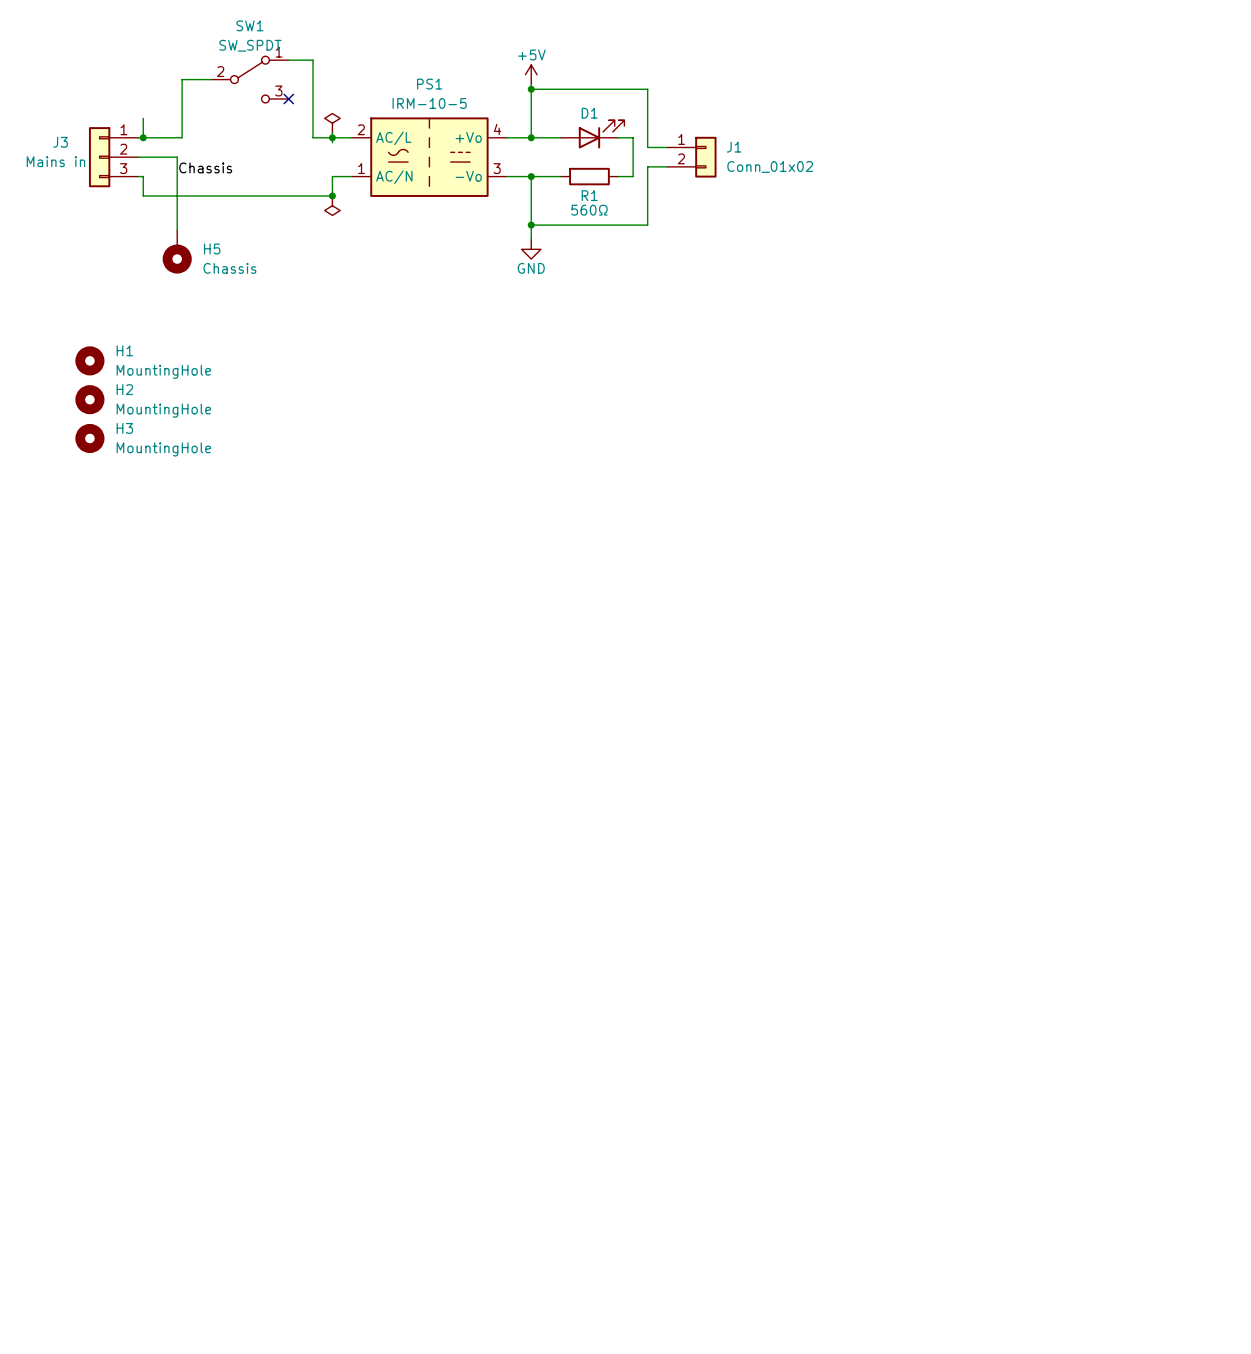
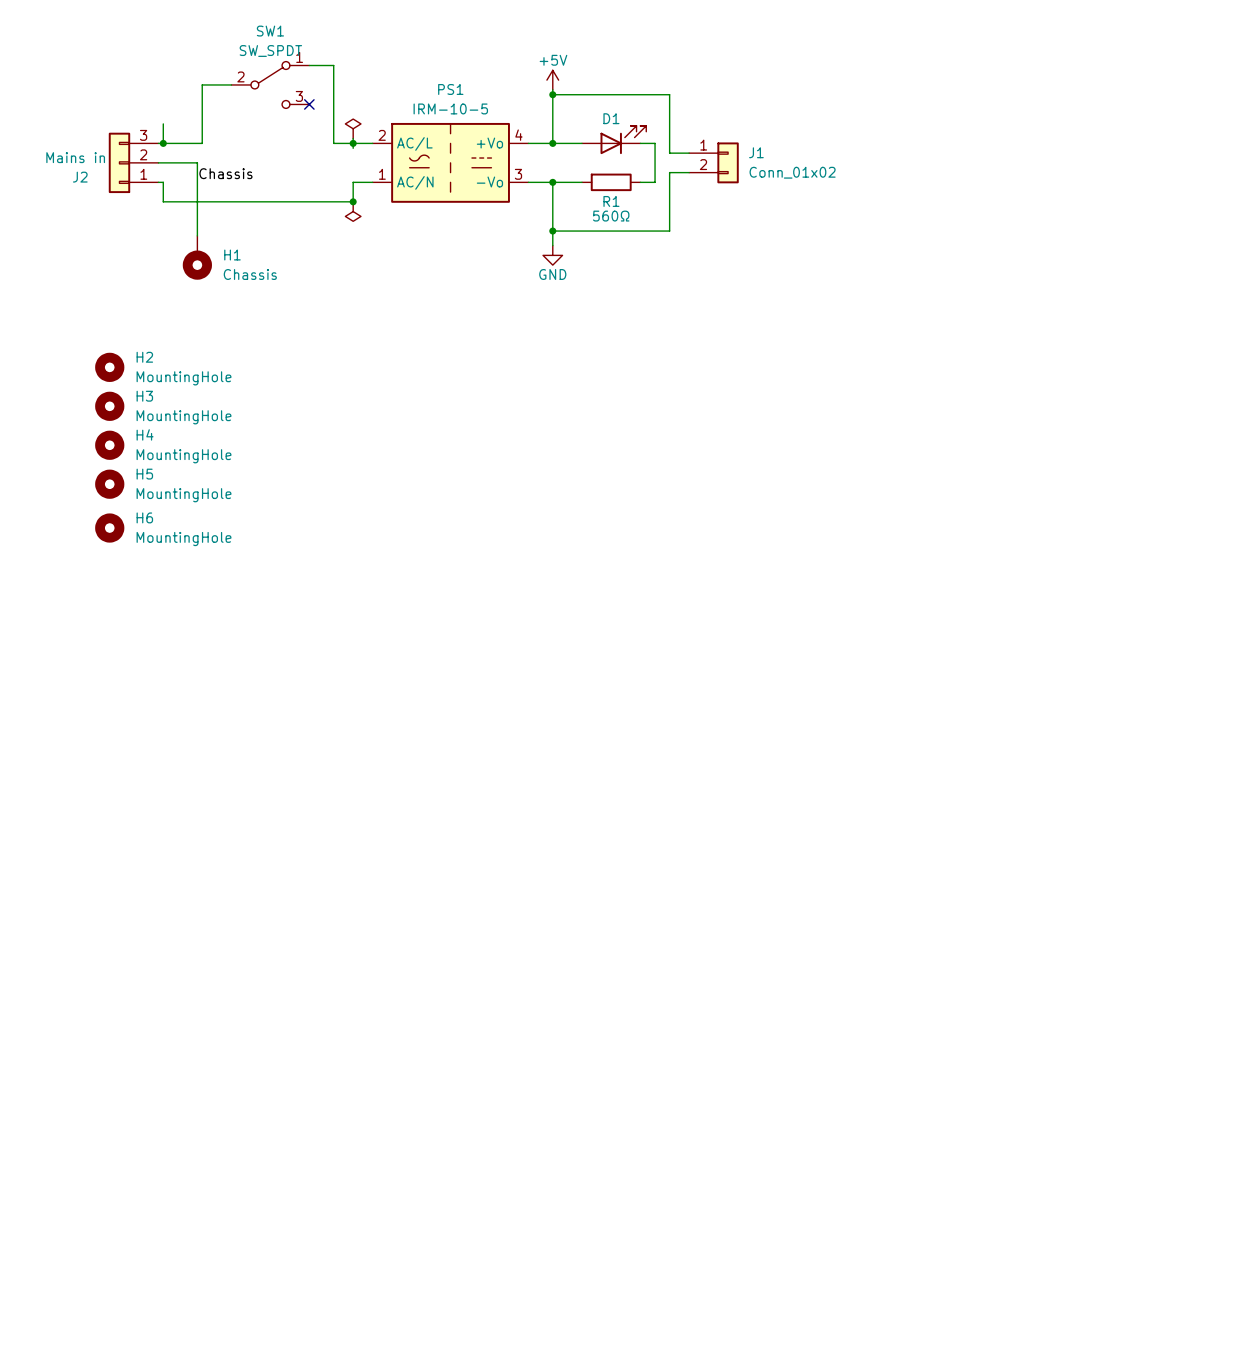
J3 name: J3 (60, 142) -> J2 (80, 177)
J3 flip: as is (99, 157) -> up-down (119, 162)
H5 name: H5 (212, 248) -> H1 (232, 255)
H1 name: H1 (124, 350) -> H2 (144, 357)
H2 name: H2 (124, 389) -> H3 (144, 396)
H3 name: H3 (124, 428) -> H4 (145, 434)
H5: none -> MountingHole (109, 484)
H6: none -> MountingHole (109, 528)

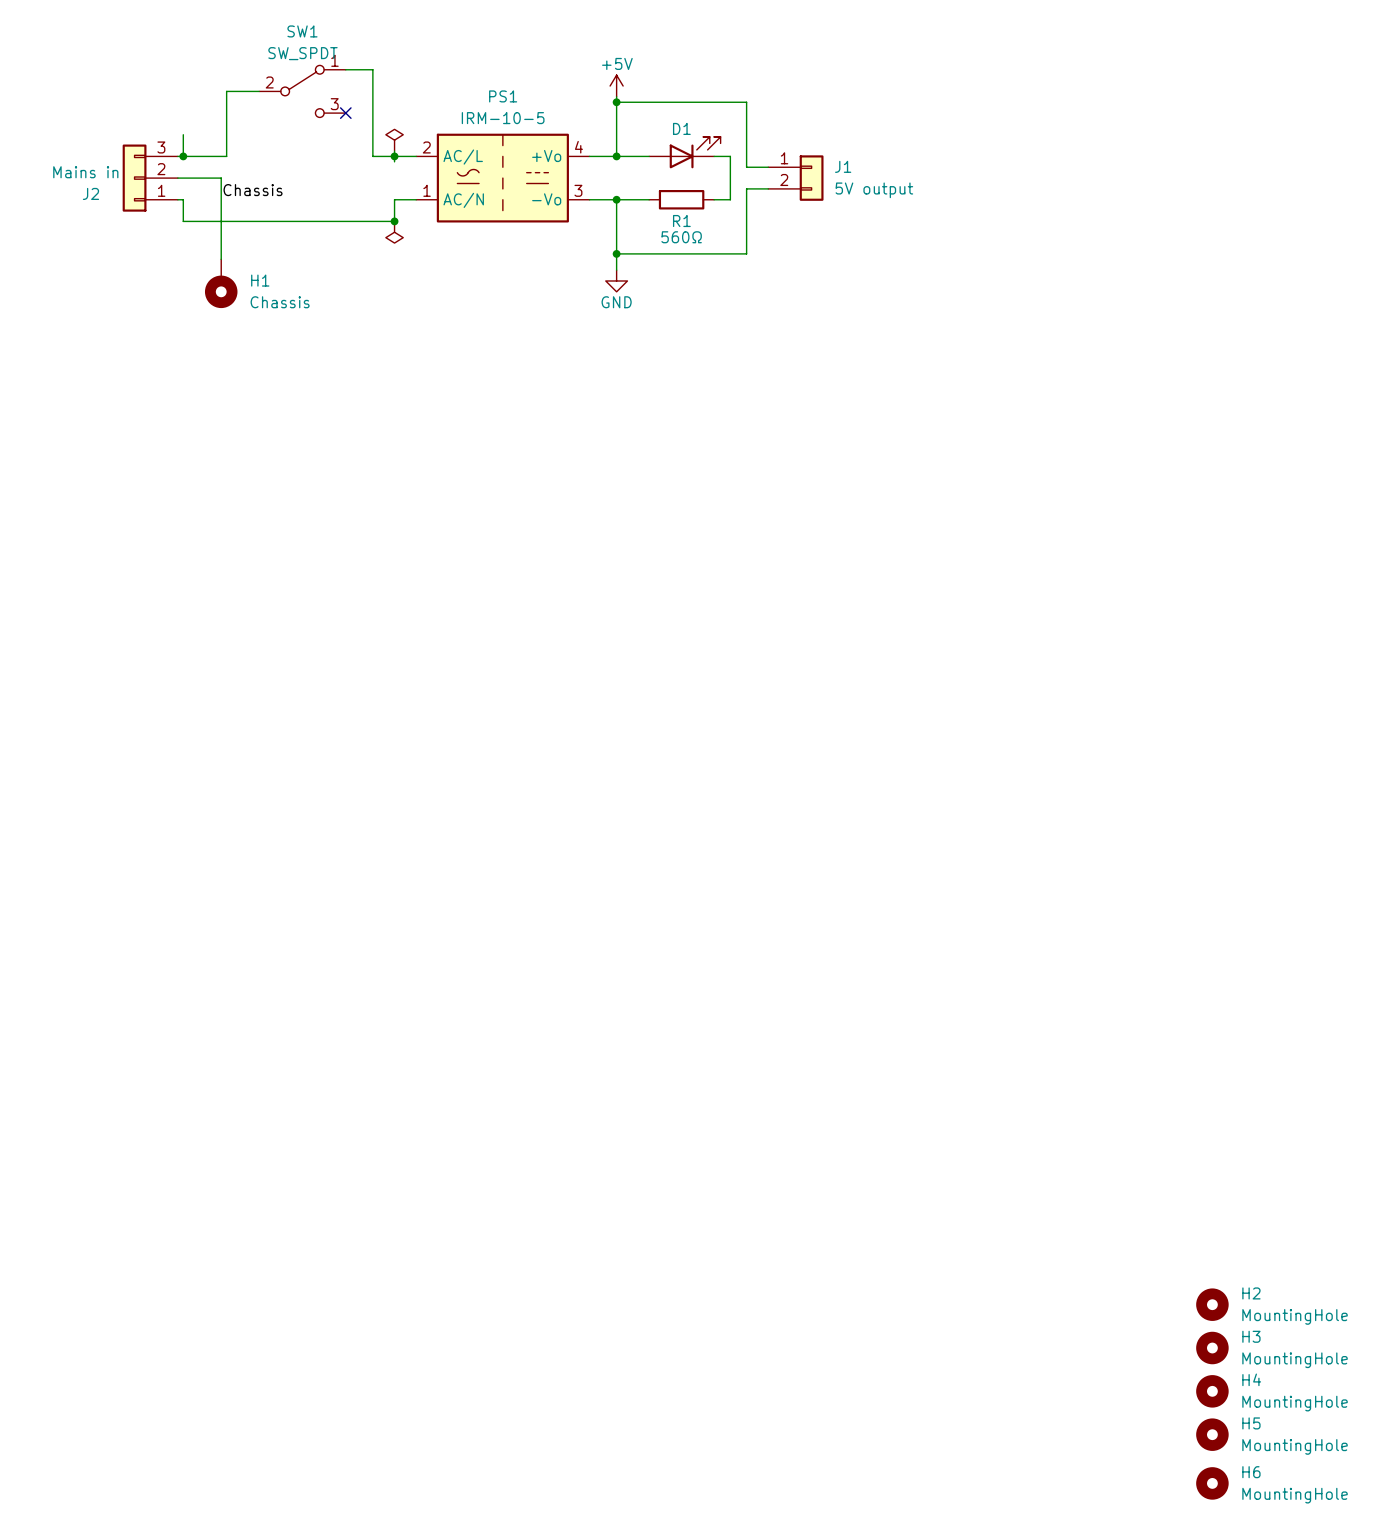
J1 value: Conn_01x02 (792, 172) -> 5V output (874, 190)
H2 position: (109, 367) -> (1212, 1304)
H3 position: (109, 406) -> (1212, 1348)
H4 position: (109, 445) -> (1212, 1391)
H5 position: (109, 484) -> (1212, 1434)
H6 position: (109, 528) -> (1212, 1483)

